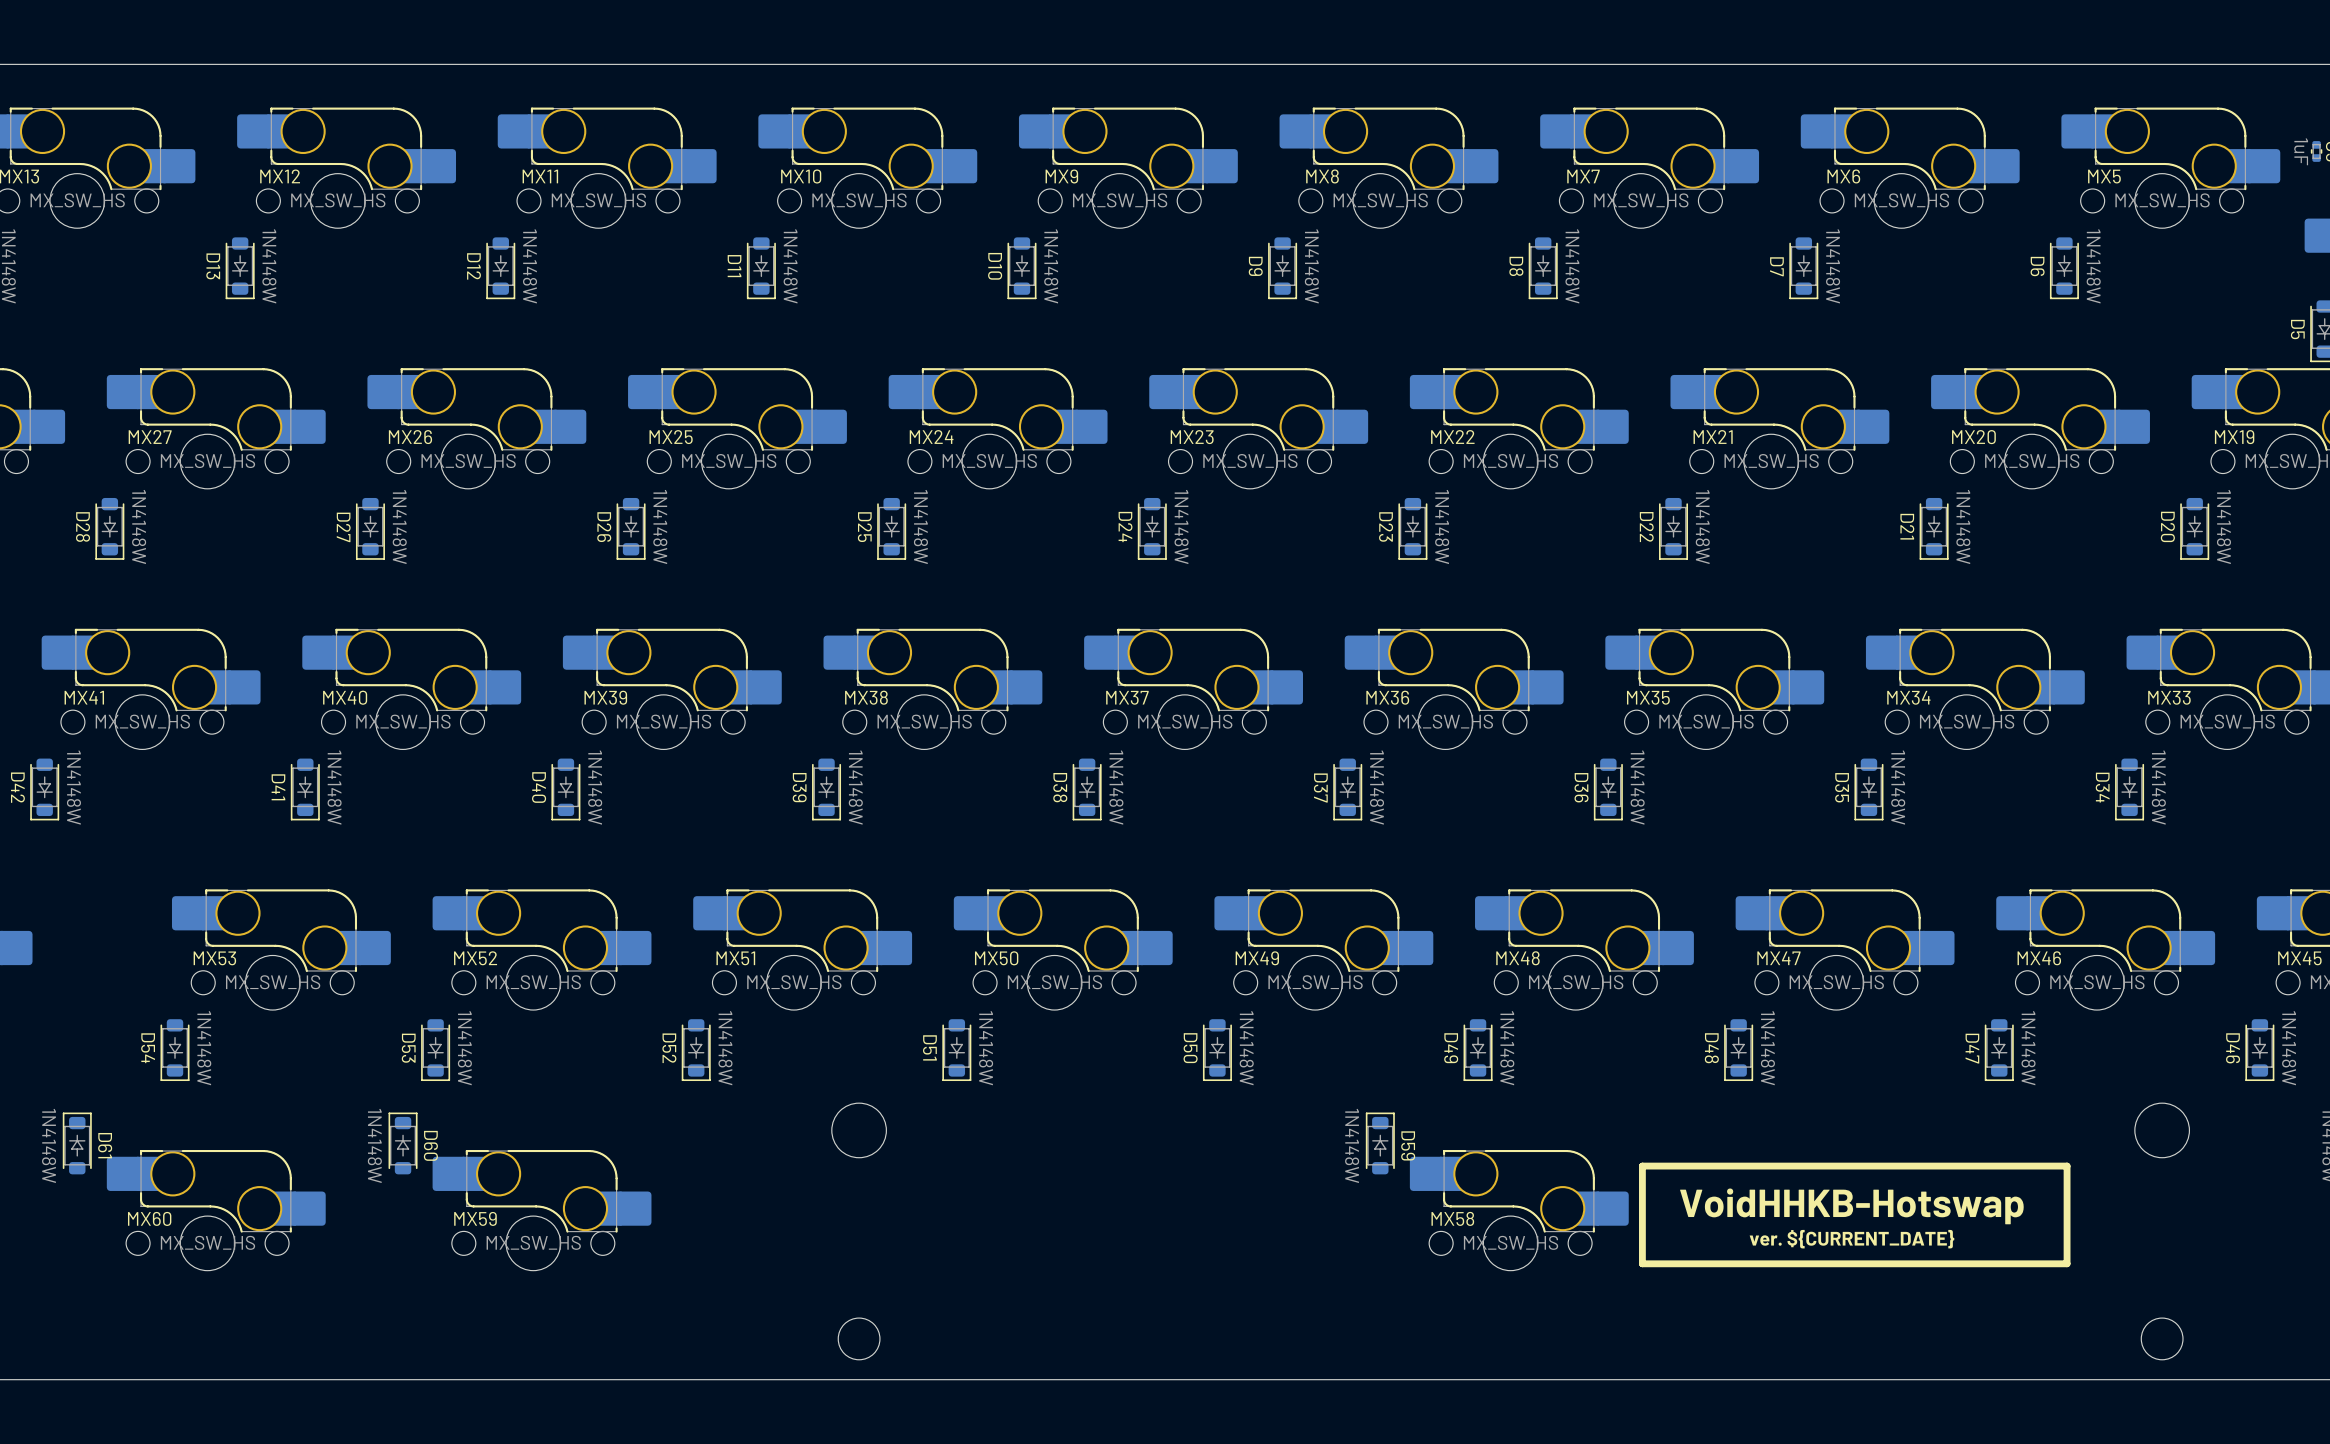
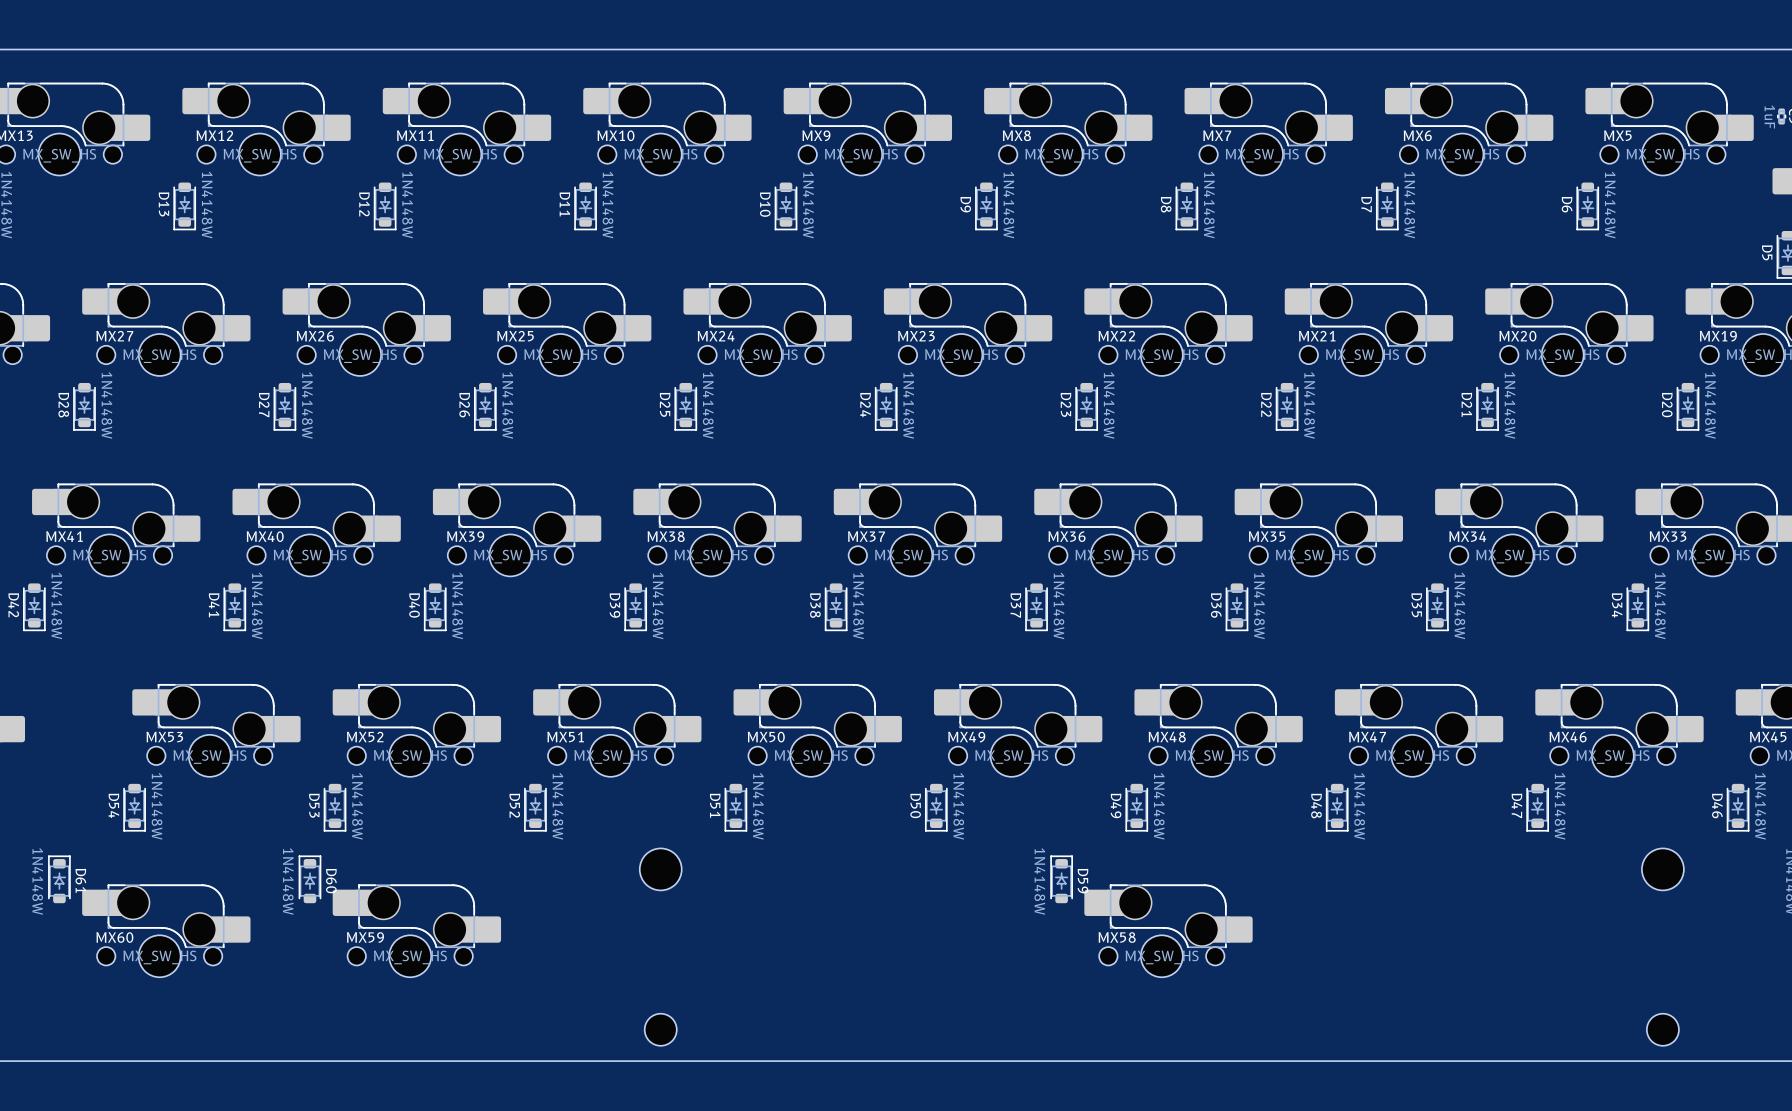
line: (2067, 1166) (1642, 1166) (1642, 1263) (2067, 1263) (2067, 1166) -> none
text: VoidHHKB-Hotswap (1851, 1206) -> none
text: ver. ${CURRENT_DATE} (1852, 1239) -> none

